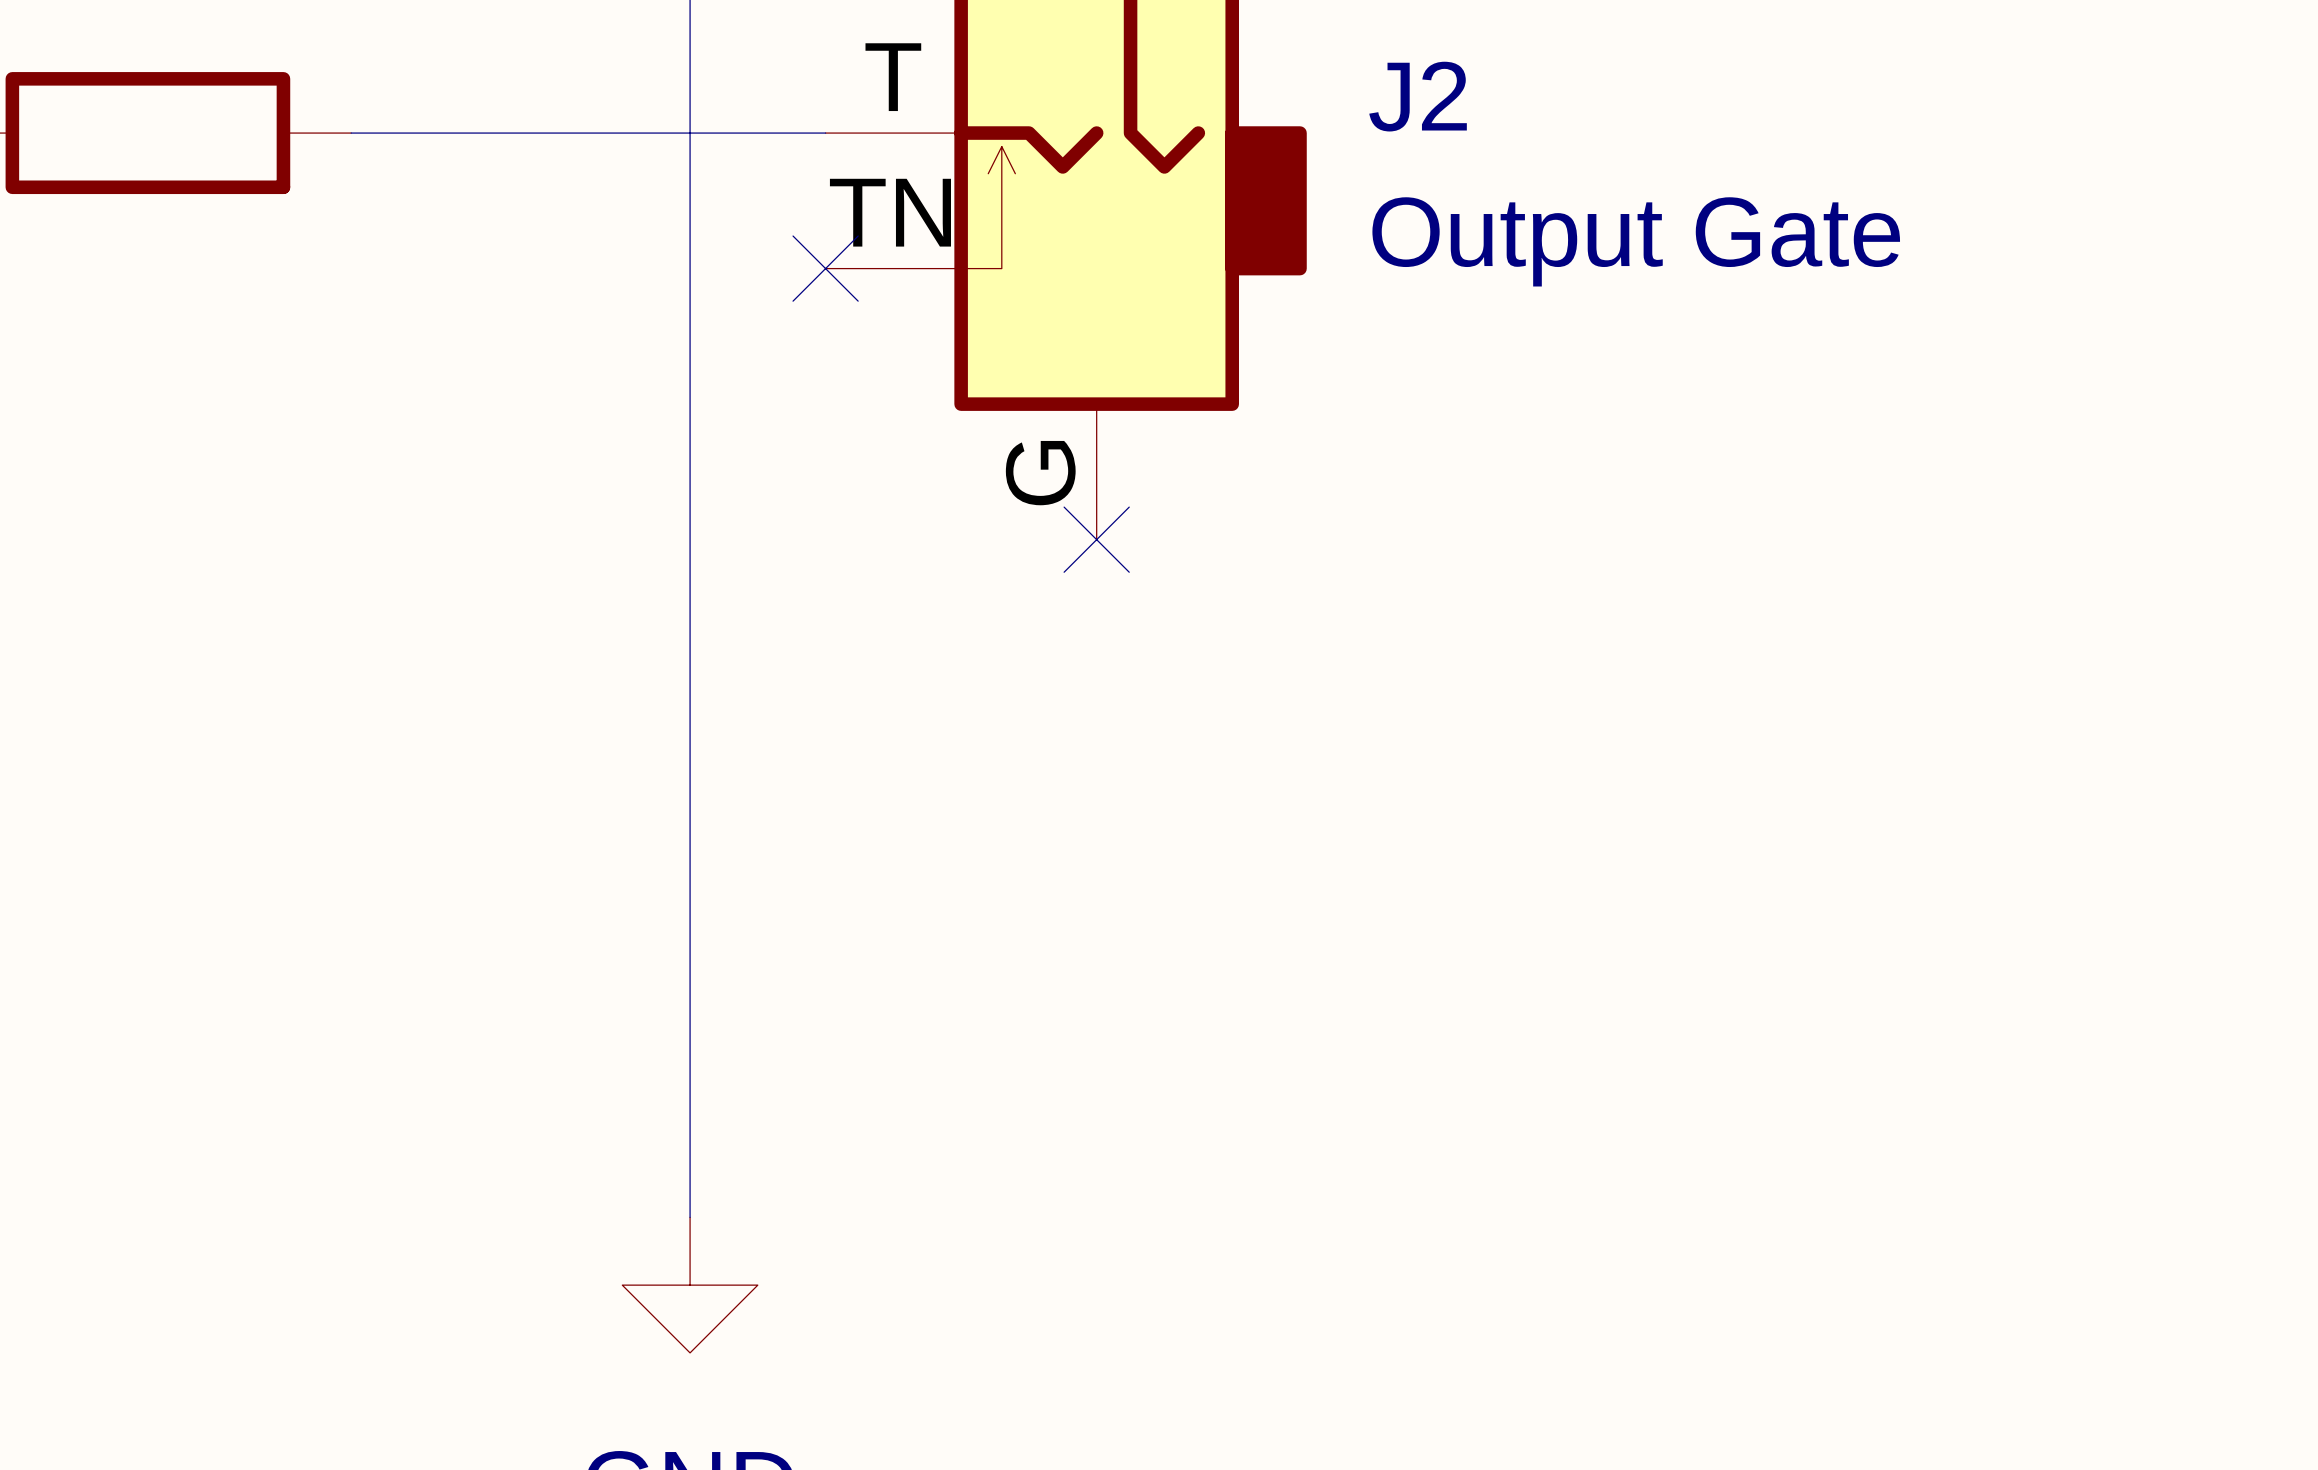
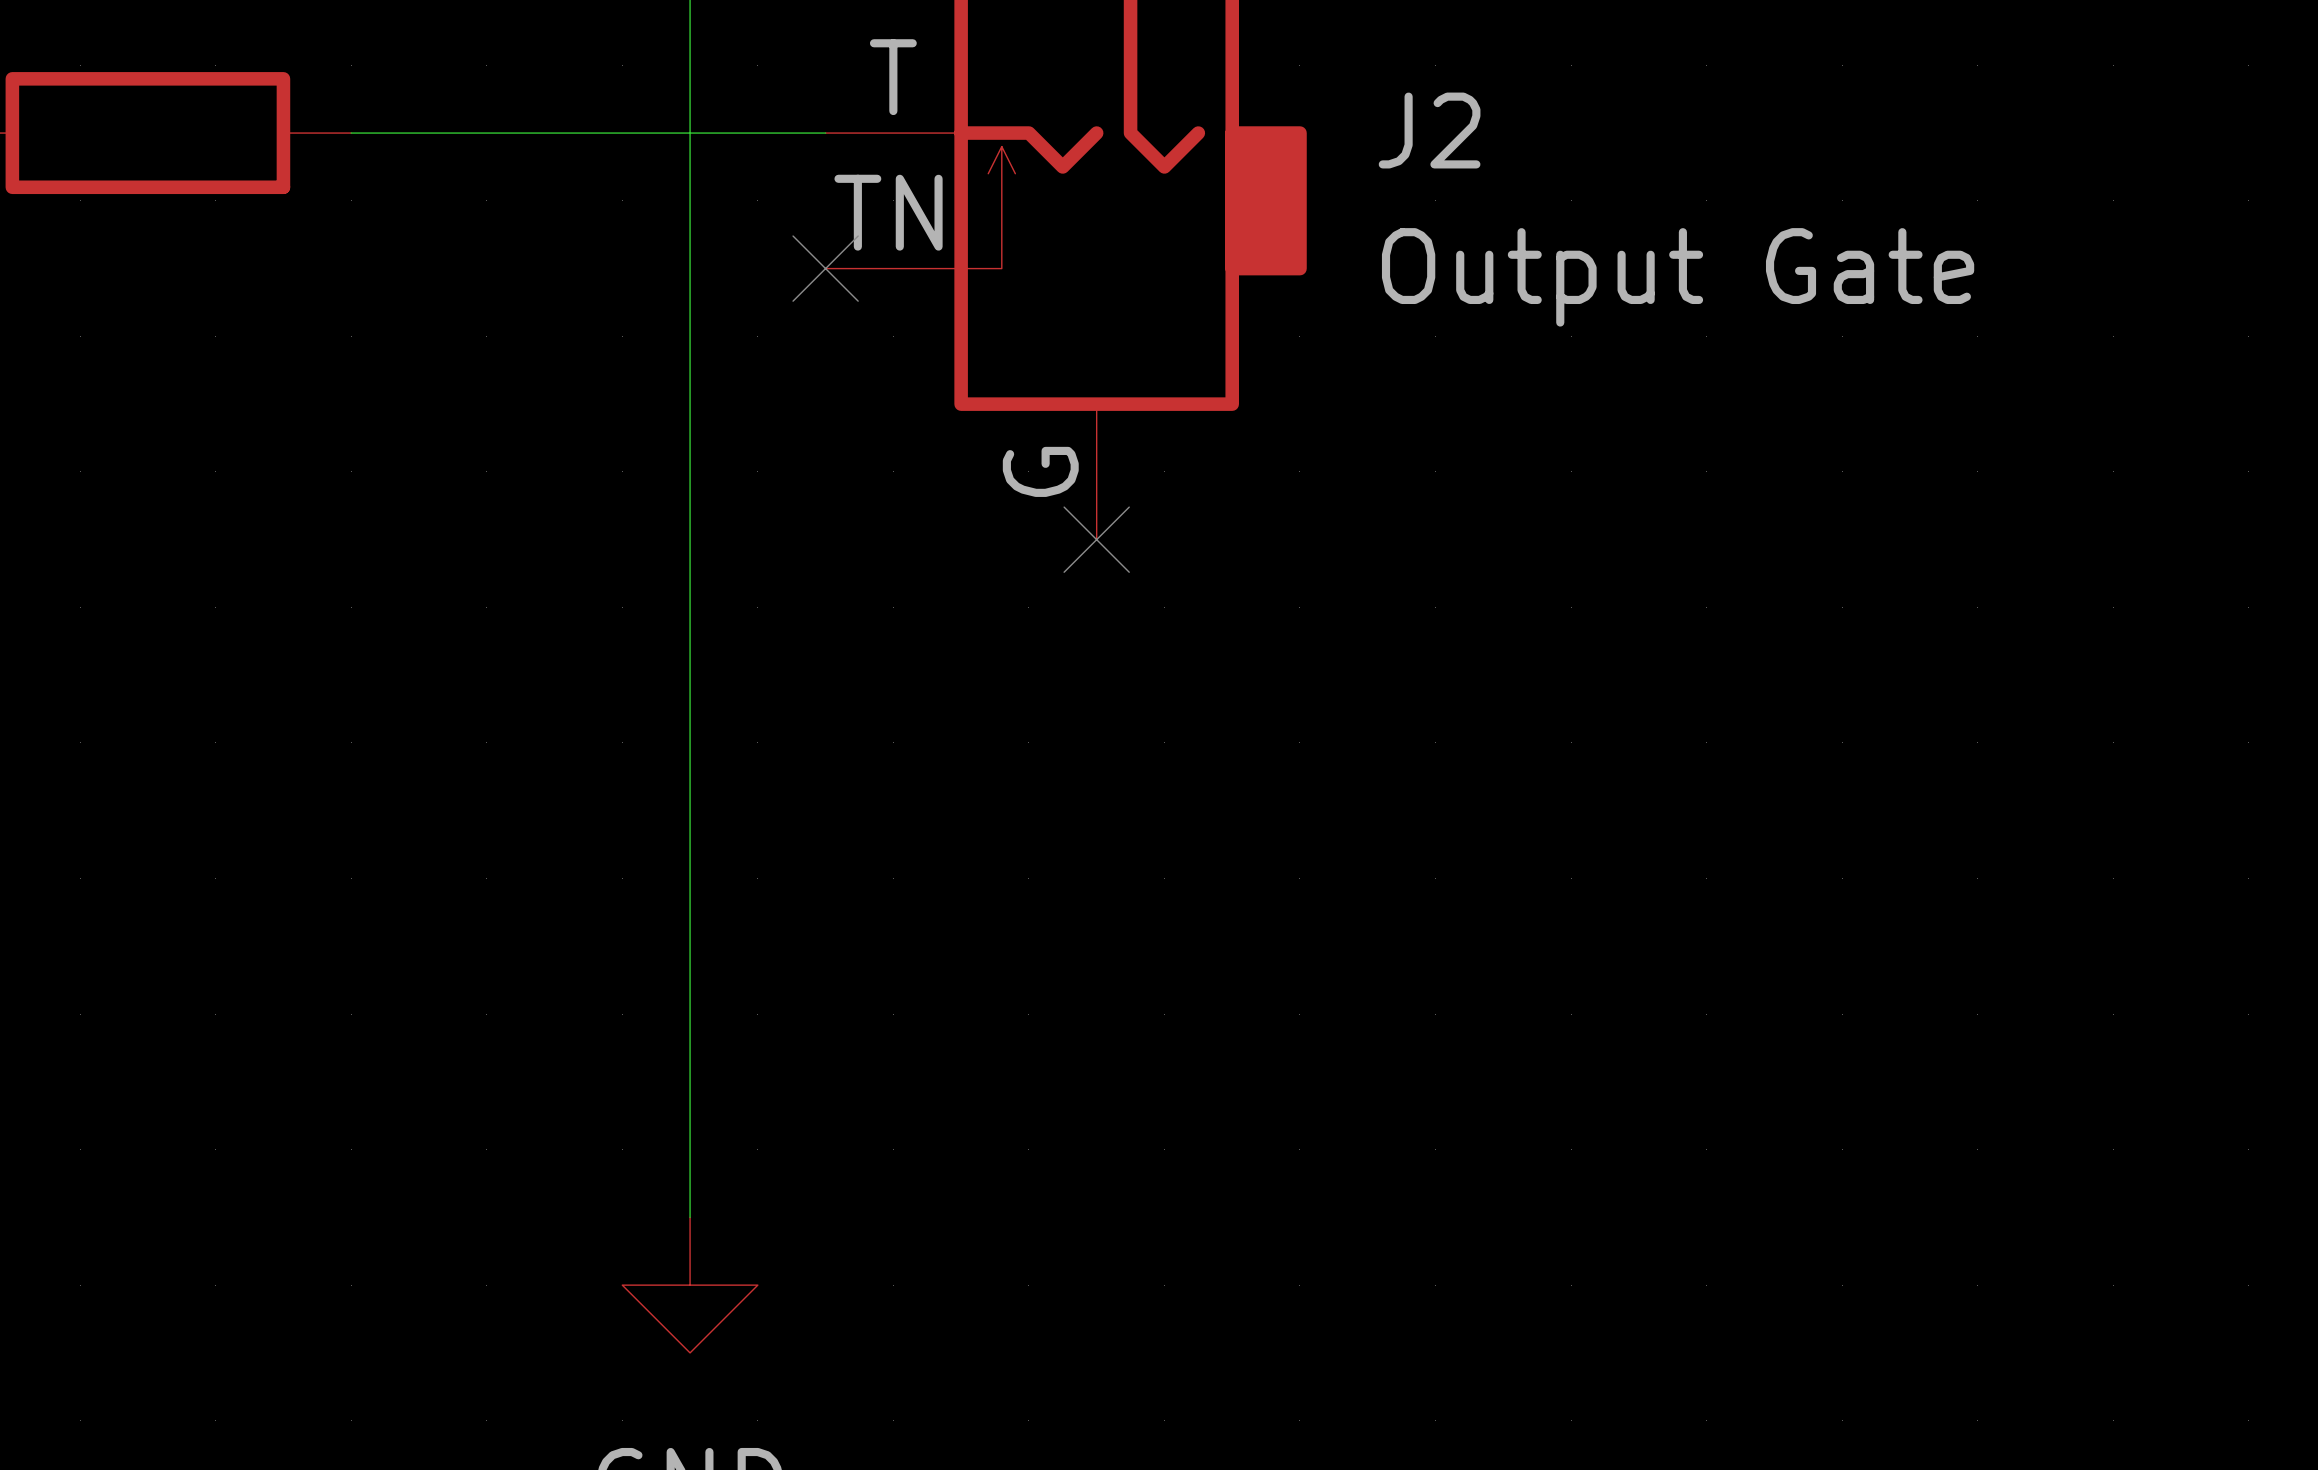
J2 name position: J2 (1418, 96) -> J2 (1429, 130)
J2 value position: Output Gate (1636, 241) -> Output Gate (1678, 277)

